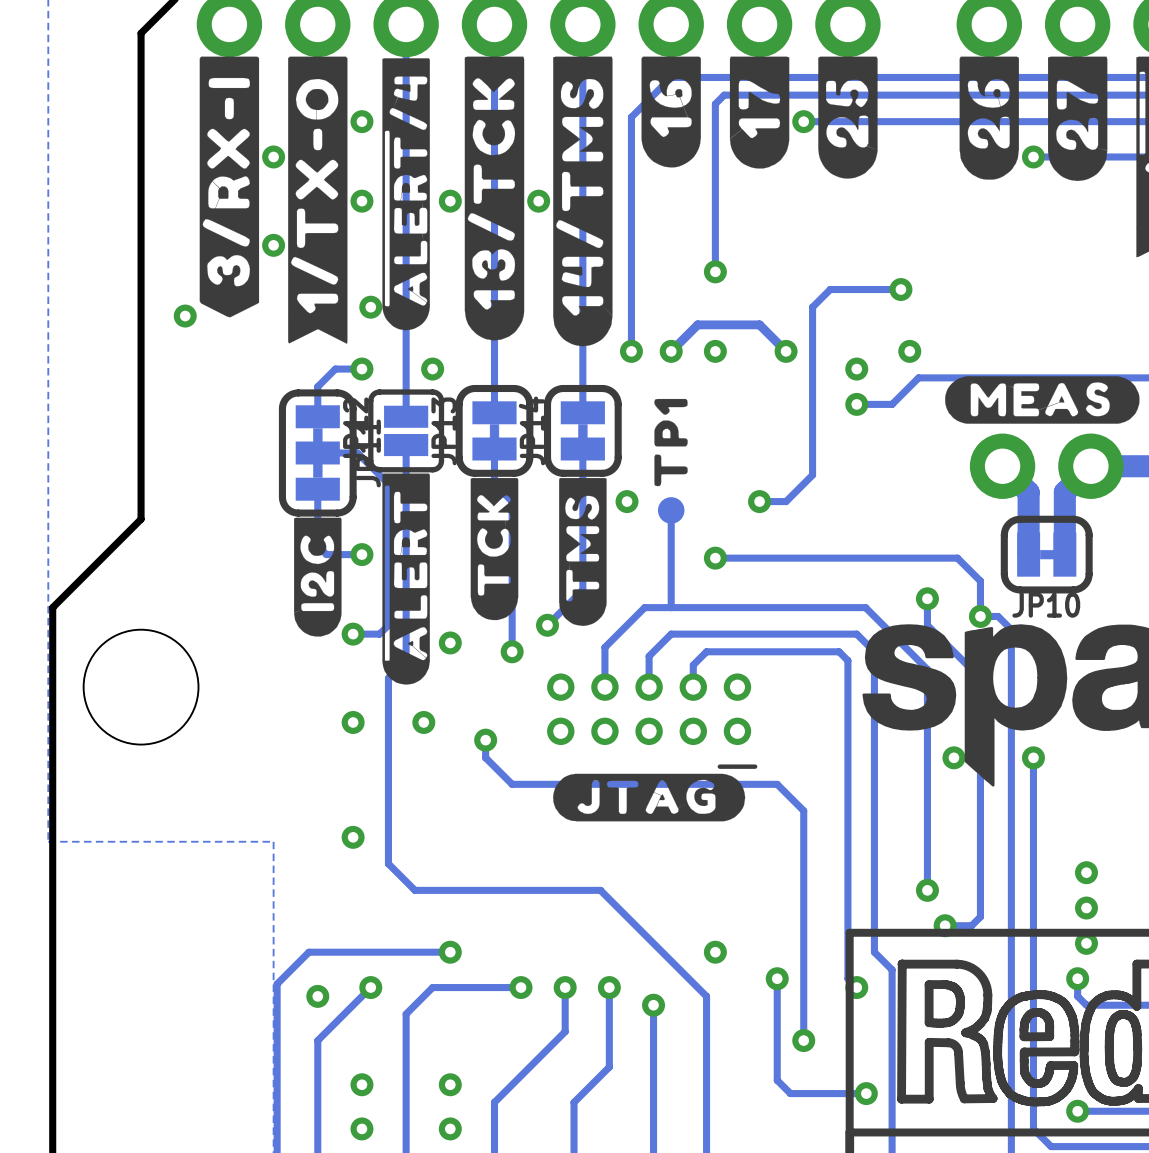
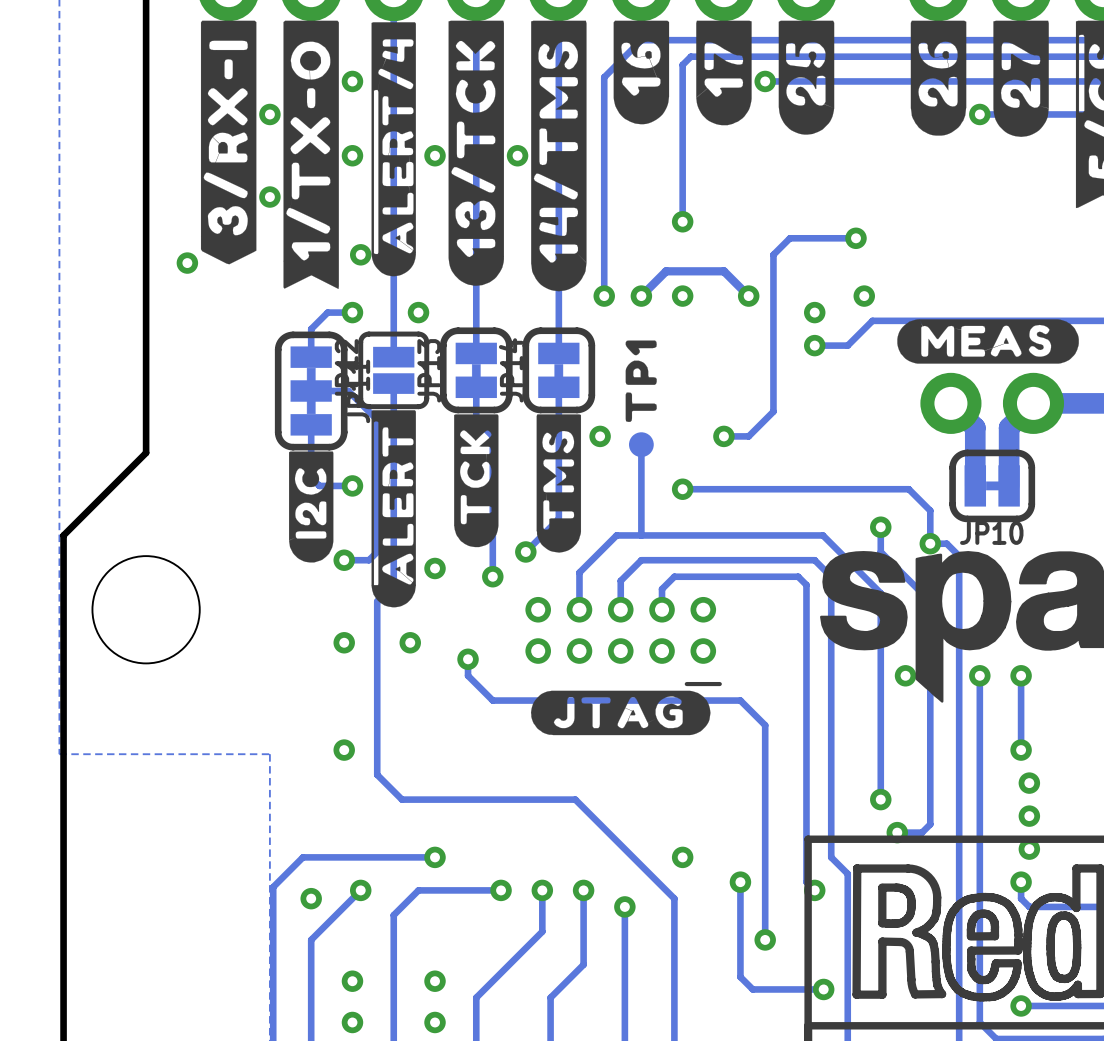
track: none -> (1021, 675) (1021, 750)
via: none -> (1021, 675)
via: none -> (1021, 750)

